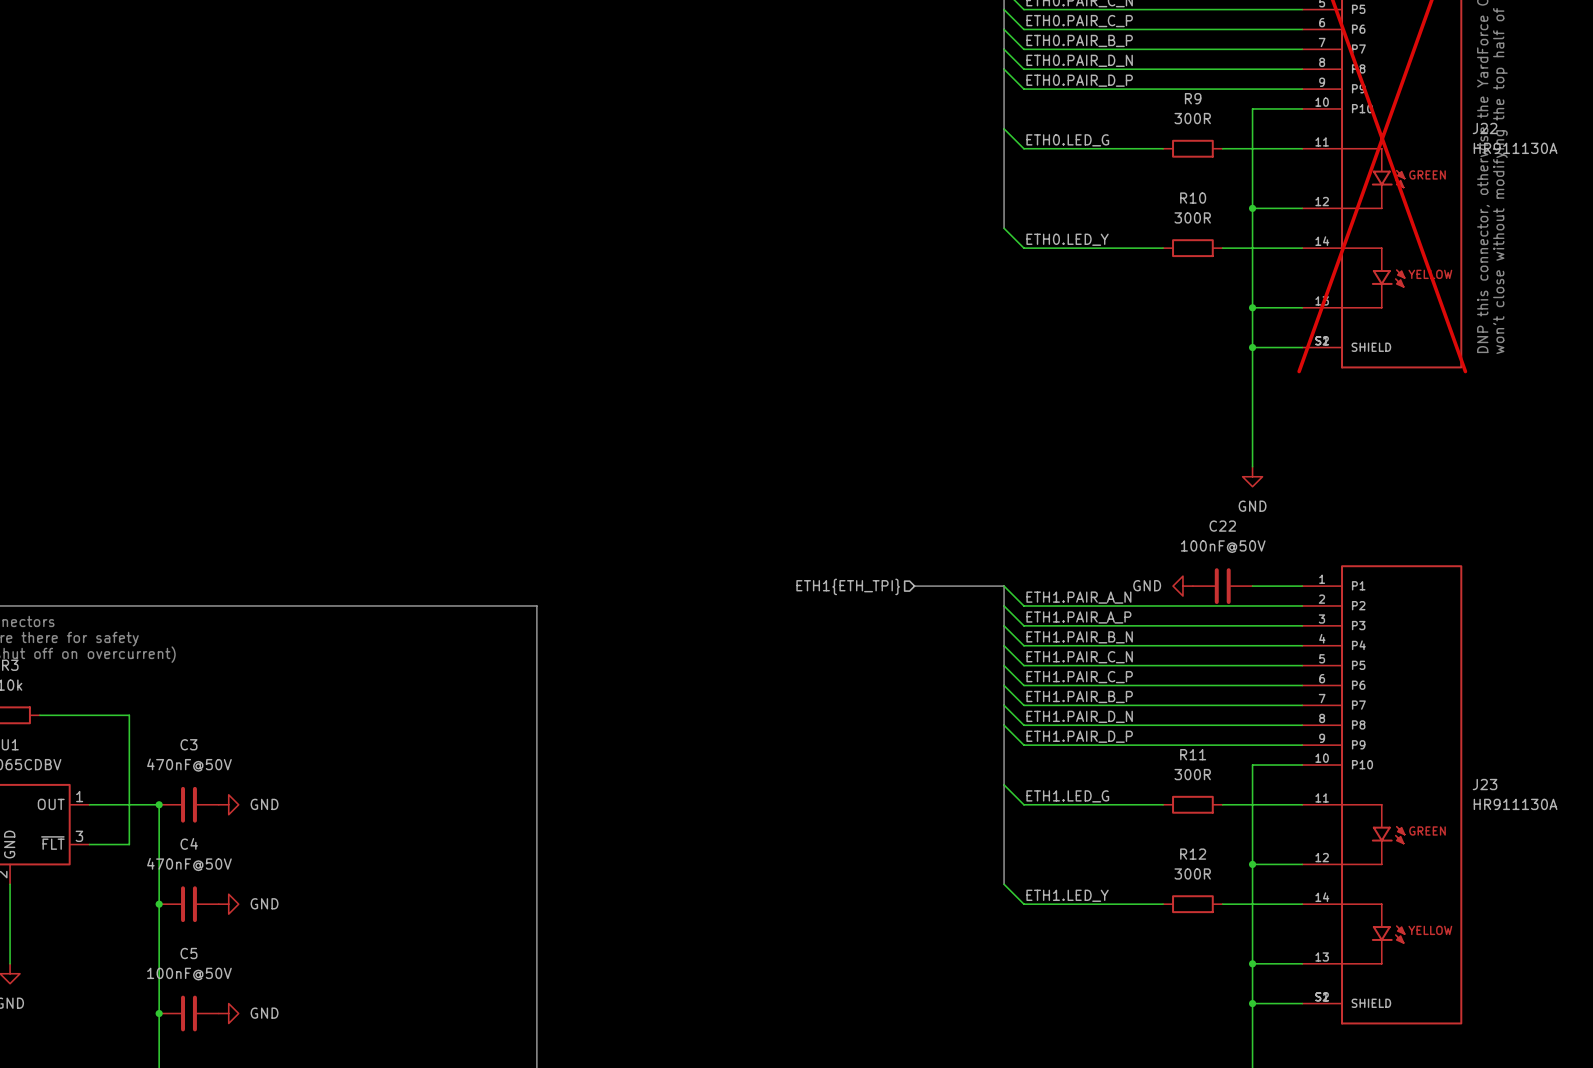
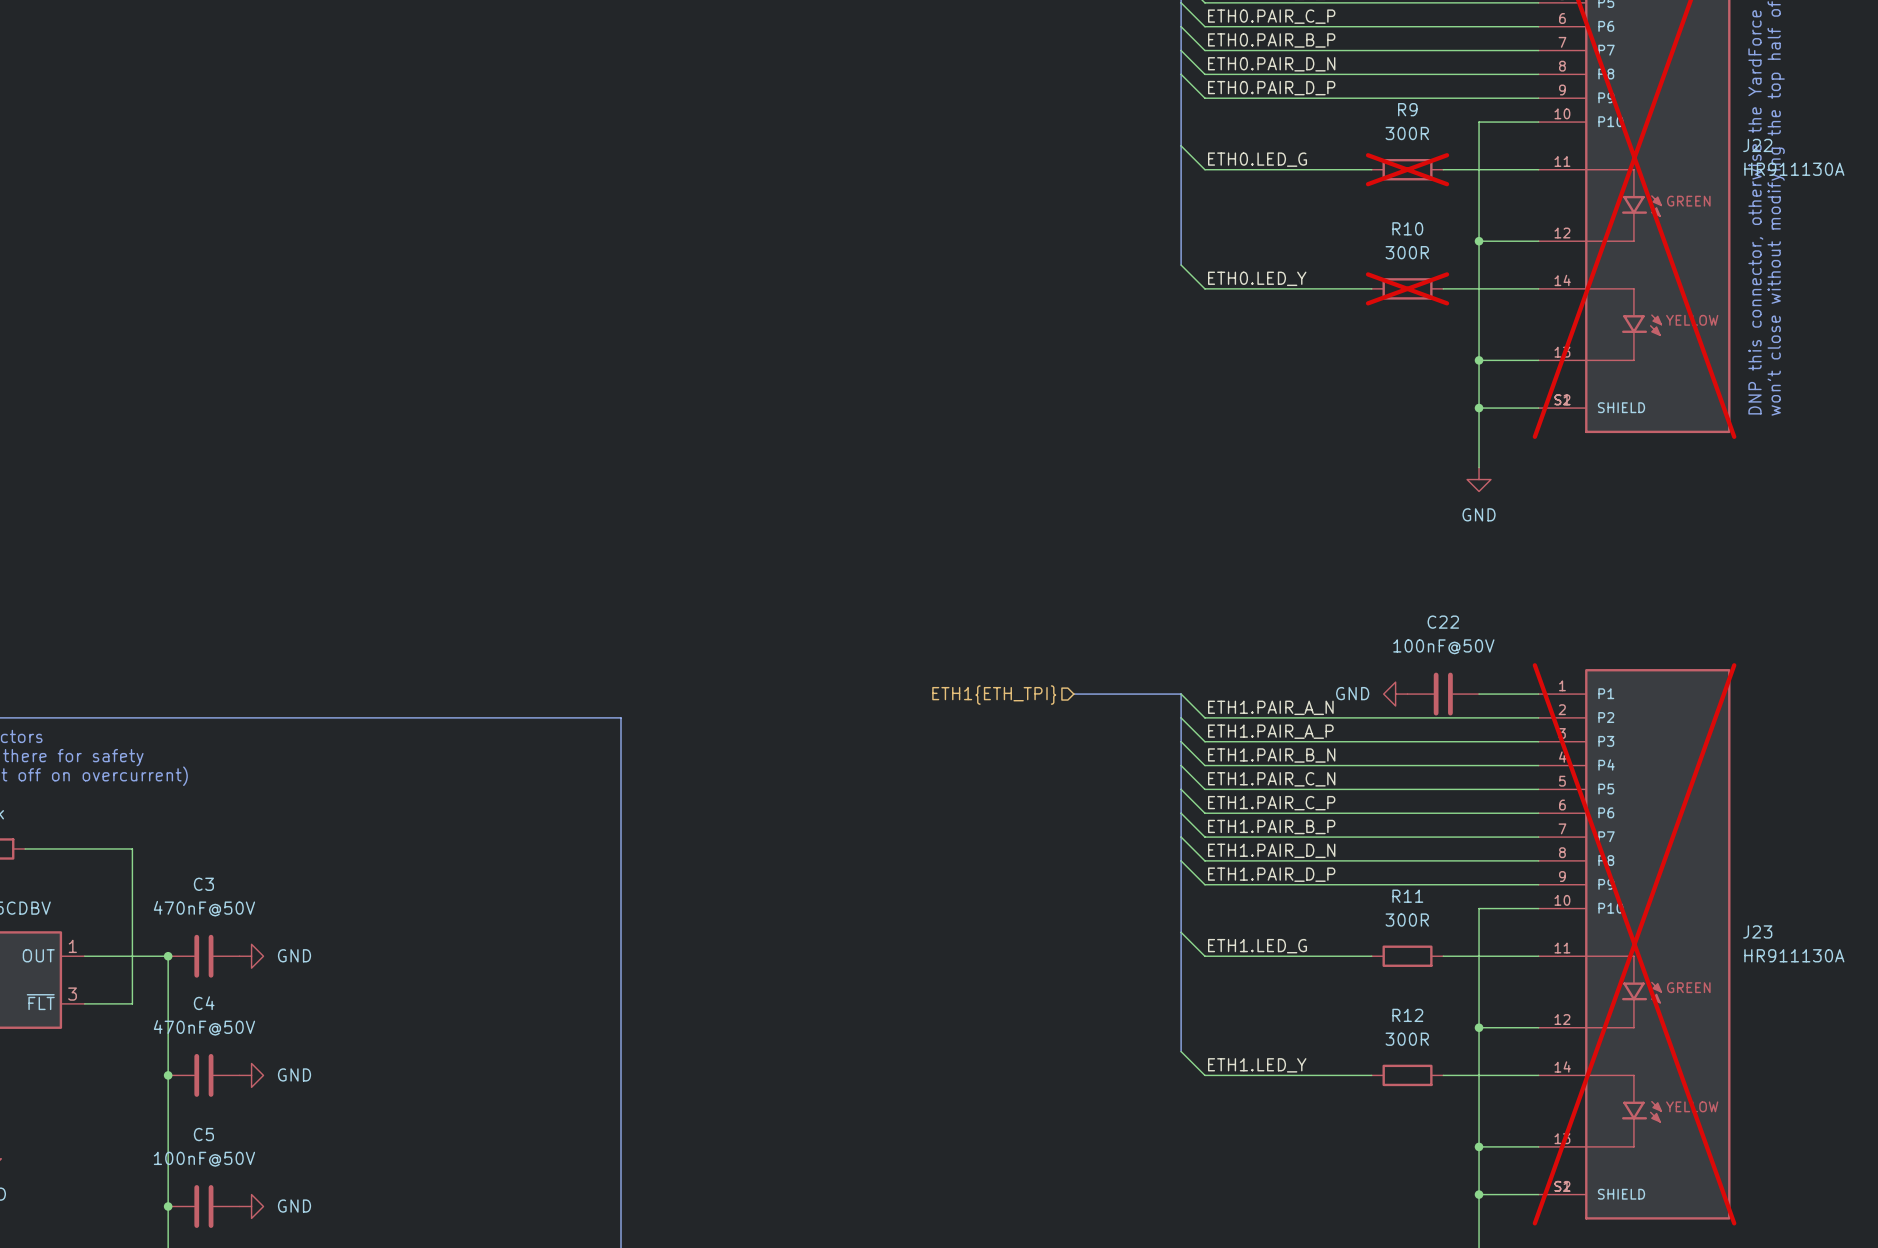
R9 do-not-place cross: none -> (1407, 169)
R10 do-not-place cross: none -> (1407, 288)
wire: (1252, 397) (1252, 466) -> none
power symbol position: GND (1252, 476) -> GND (1479, 479)
J23 do-not-place cross: none -> (1634, 944)

